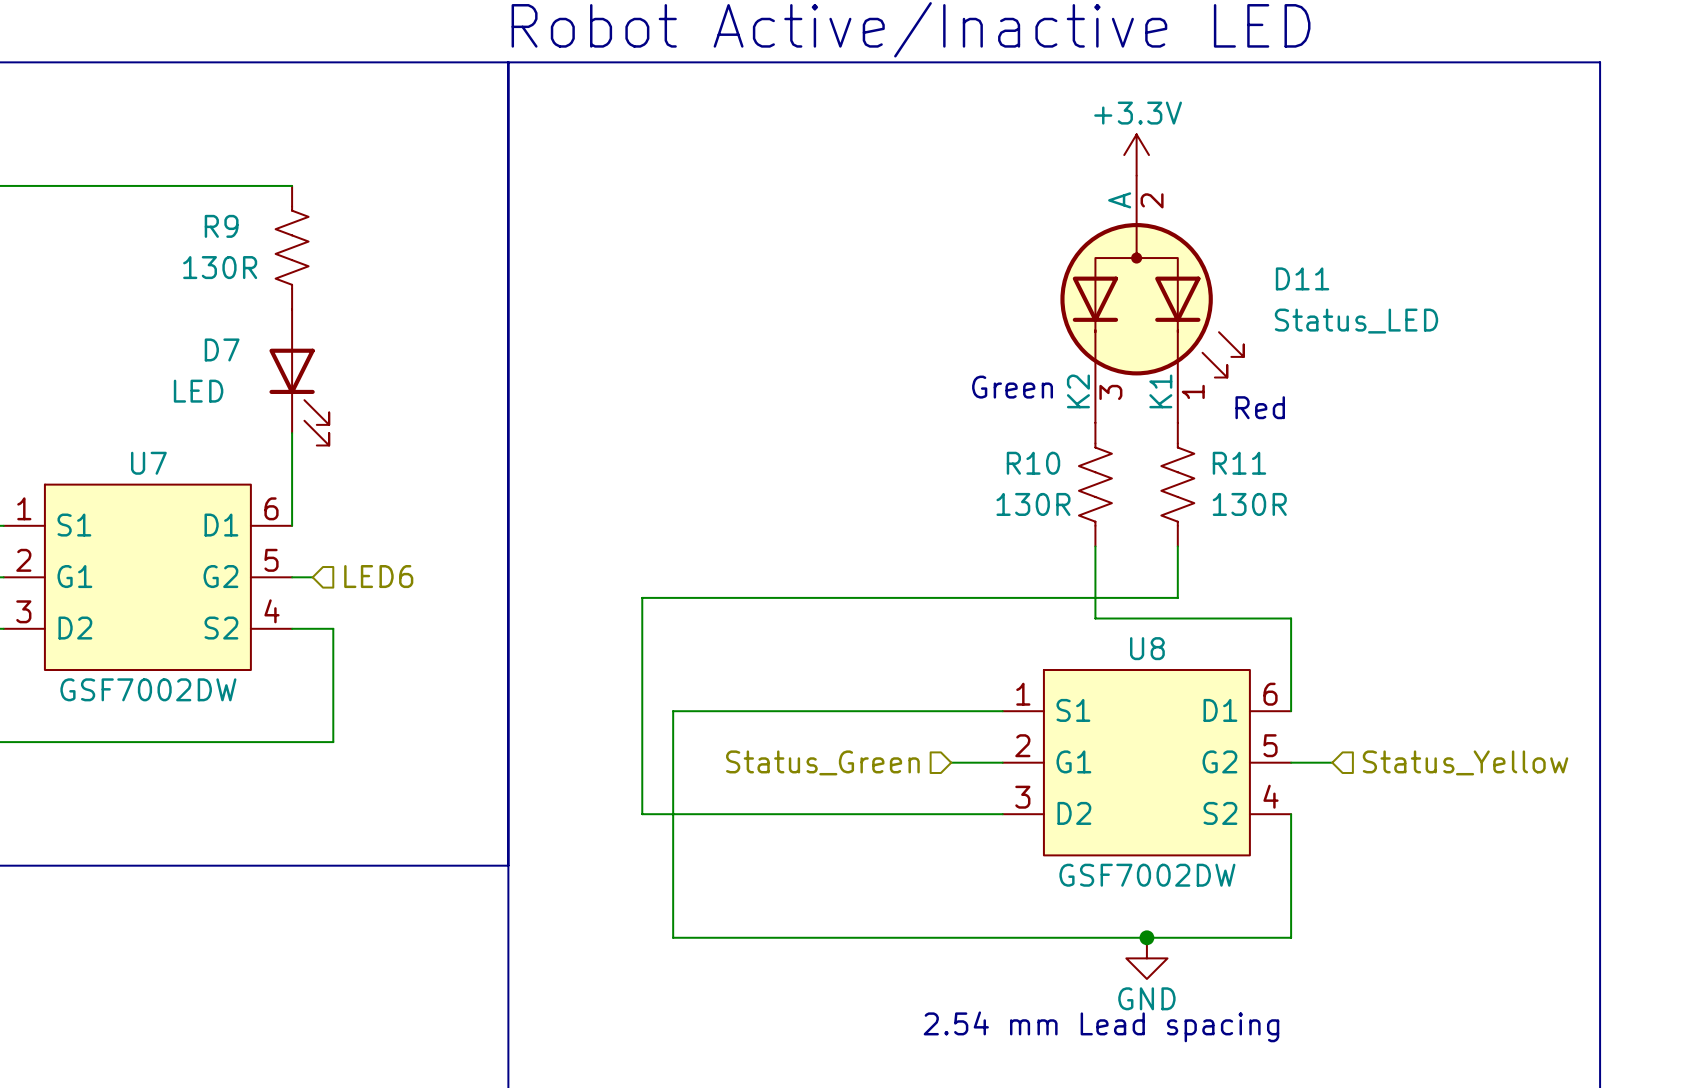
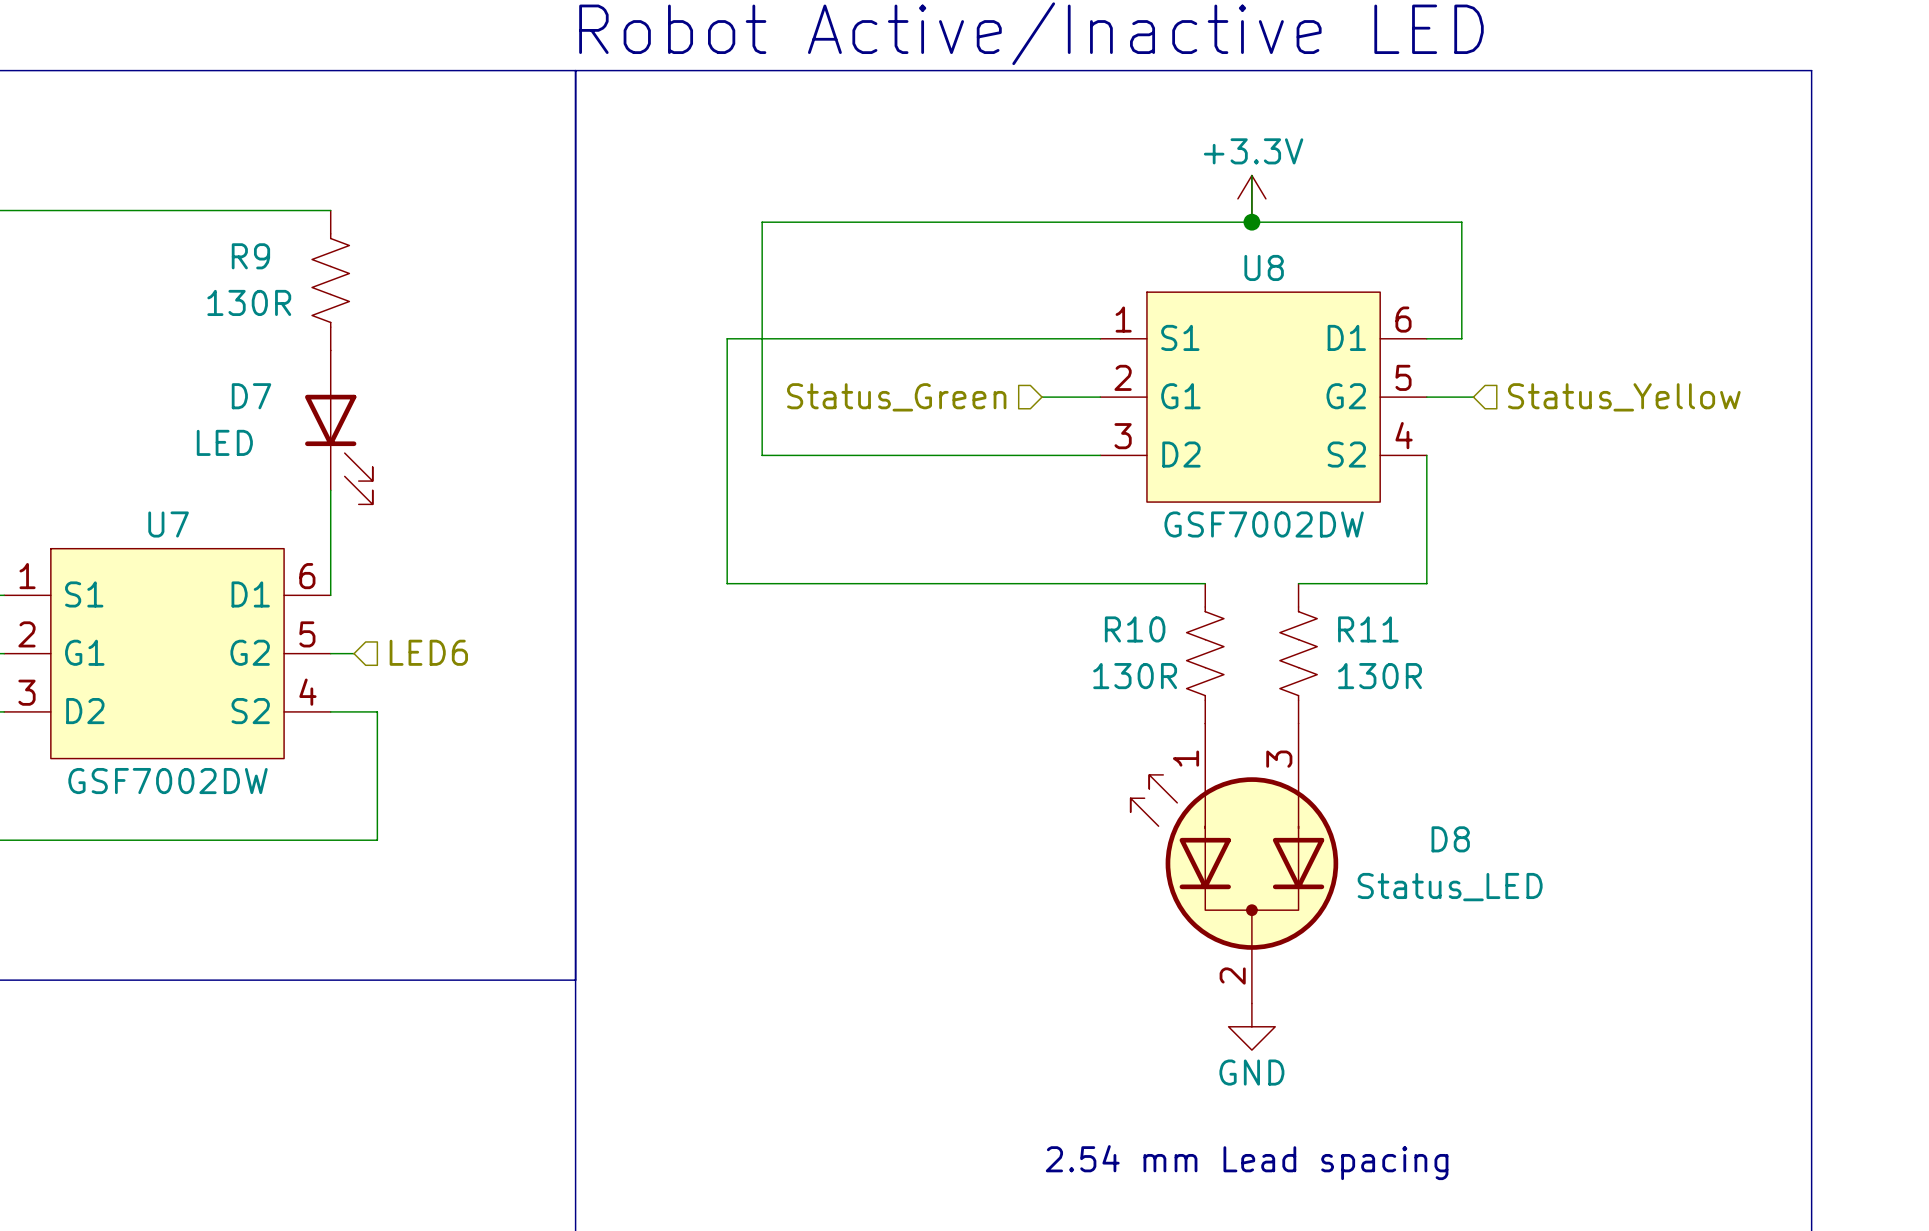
wire: none -> (1251, 175) (1251, 222)
power symbol position: +3.3V (1136, 155) -> +3.3V (1251, 198)
junction: none -> (1251, 222)
wire: none -> (1100, 338) (727, 338) (727, 583) (1205, 583)
D11: Status_LED (1152, 299) -> none
wire: none -> (1426, 338) (1461, 338) (1461, 222) (762, 222) (762, 455) (1100, 455)
hierarchical label: none -> Status_Green (896, 397)
wire: none -> (1042, 397) (1100, 397)
wire: none -> (1426, 397) (1473, 397)
hierarchical label: none -> Status_Yellow (1624, 397)
text: Green (1012, 387) -> none
wire: none -> (1426, 455) (1426, 583) (1298, 583)
text: Red (1260, 407) -> none
R10 position: (1095, 484) -> (1205, 653)
R11 position: (1177, 484) -> (1298, 653)
wire: (1095, 546) (1095, 618) (1291, 618) (1291, 711) -> none
wire: (1177, 546) (1177, 597) (642, 597) (642, 814) (1002, 814) -> none
wire: (1002, 711) (673, 711) (673, 937) (1291, 937) (1291, 814) -> none
hierarchical label: Status_Green (822, 762) -> none
wire: (951, 762) (1002, 762) -> none
D8: none -> Status_LED (1234, 863)
U8 position: (1146, 762) -> (1263, 397)
wire: (1291, 762) (1332, 762) -> none
hierarchical label: Status_Yellow (1465, 762) -> none
junction: (1146, 937) -> none
power symbol position: GND (1146, 958) -> GND (1251, 1026)

